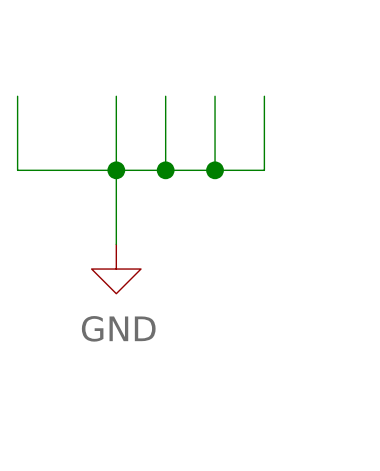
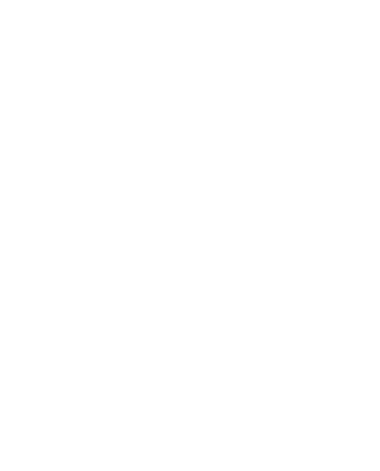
wire: (17, 96) (17, 170) (264, 170) (264, 96) -> none
wire: (116, 96) (116, 244) -> none
wire: (165, 96) (165, 170) -> none
wire: (215, 96) (215, 170) -> none
junction: (116, 170) -> none
junction: (165, 170) -> none
junction: (215, 170) -> none
power symbol: GND (116, 269) -> none

